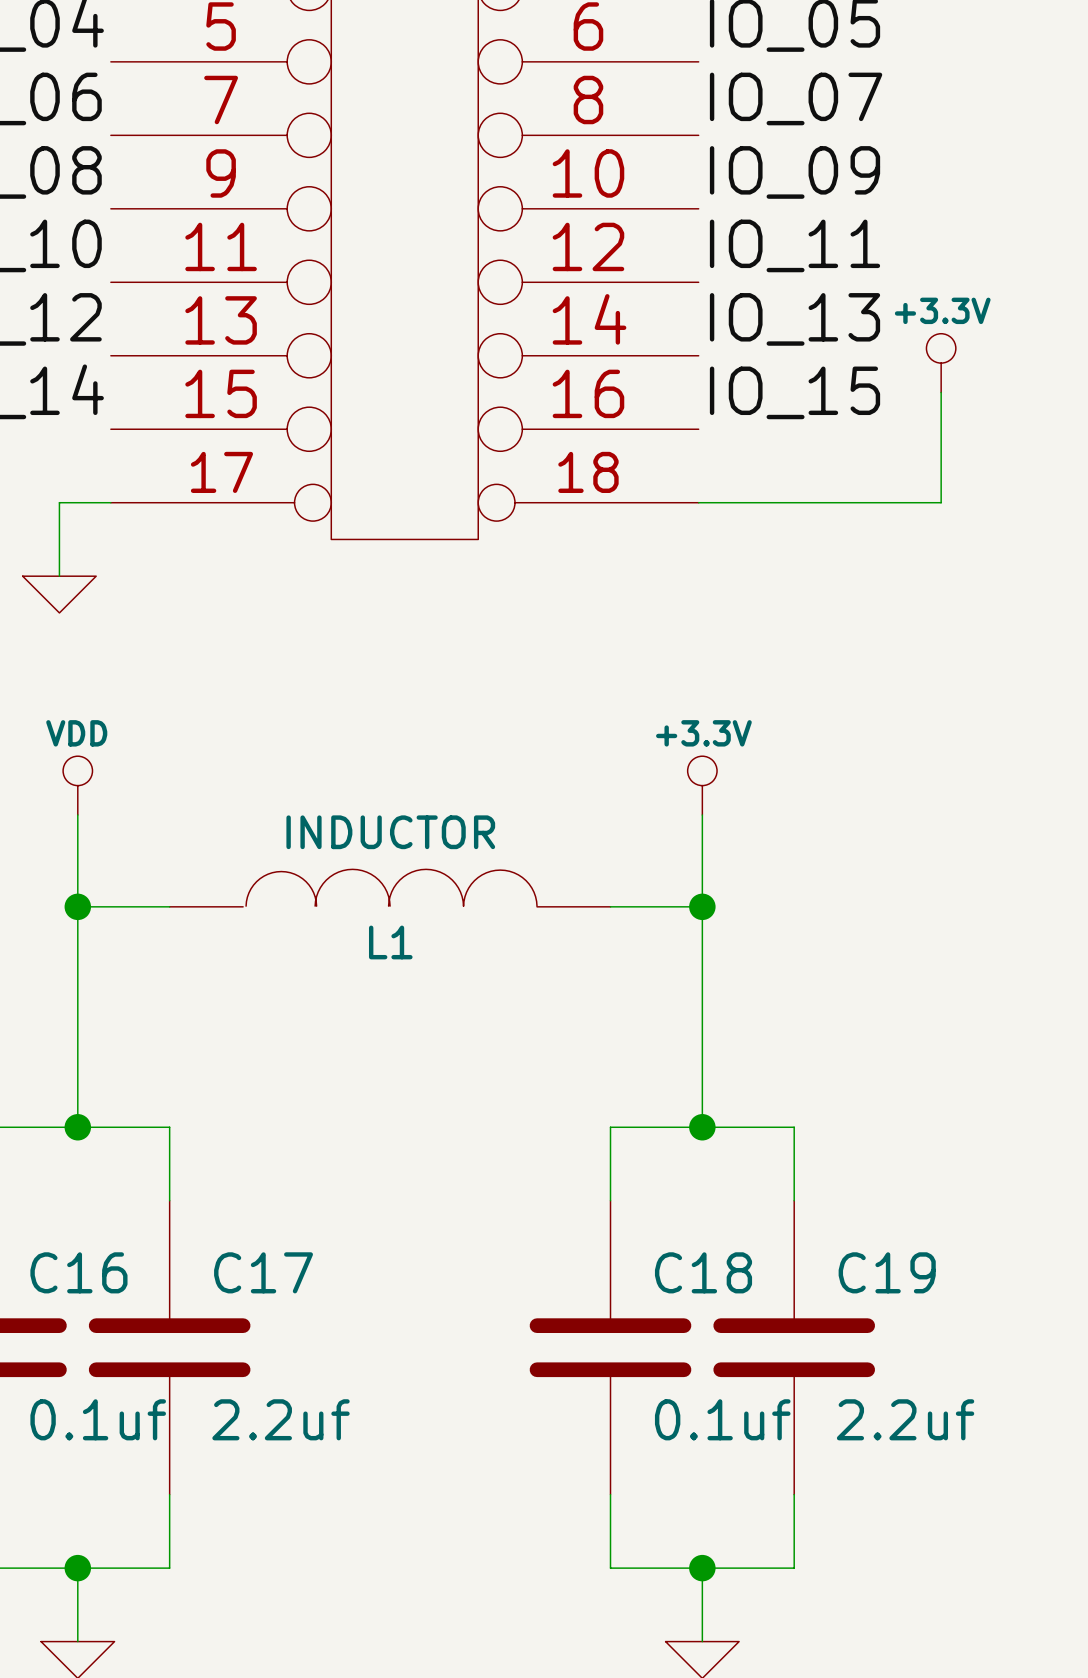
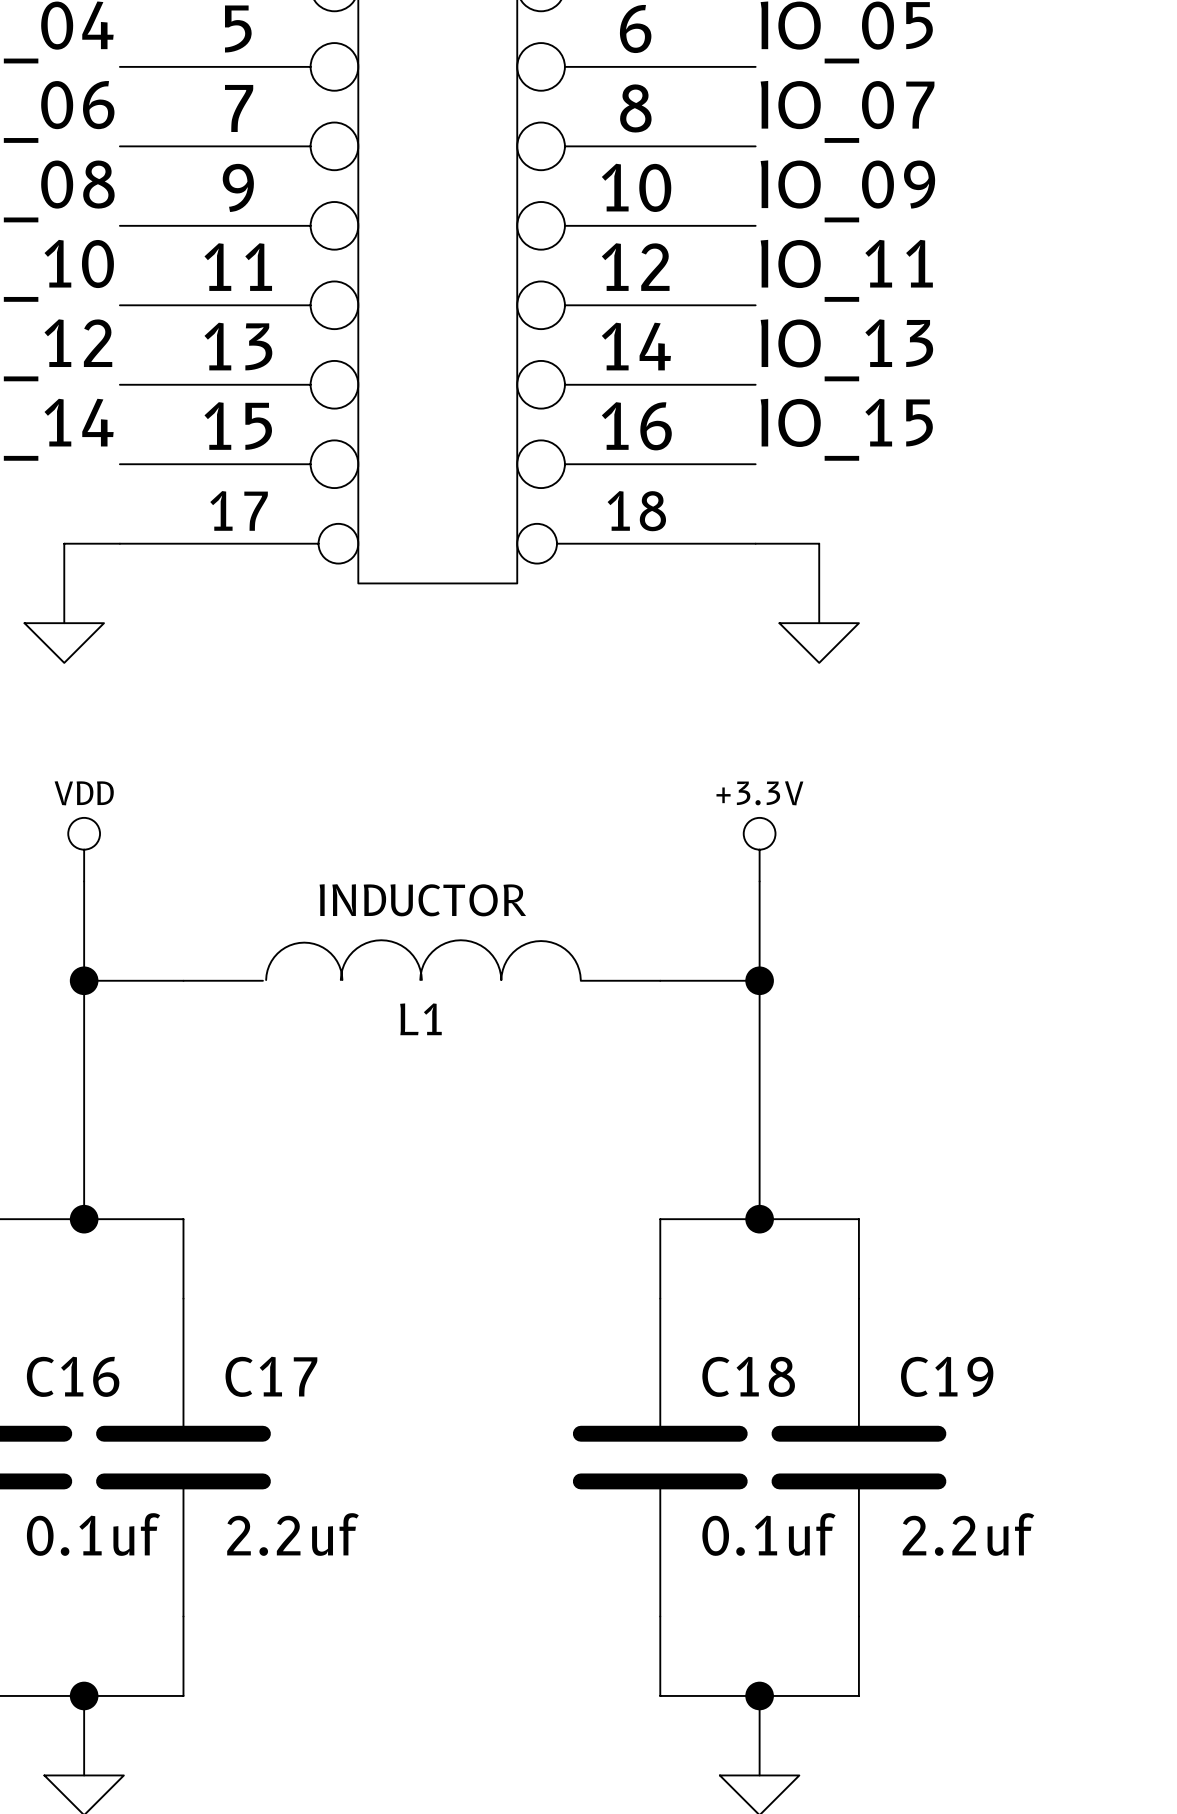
power symbol: +3.3V (941, 363) -> none
wire: (941, 392) (941, 502) (757, 502) -> (819, 623) (819, 543)
power symbol: none -> (819, 643)

